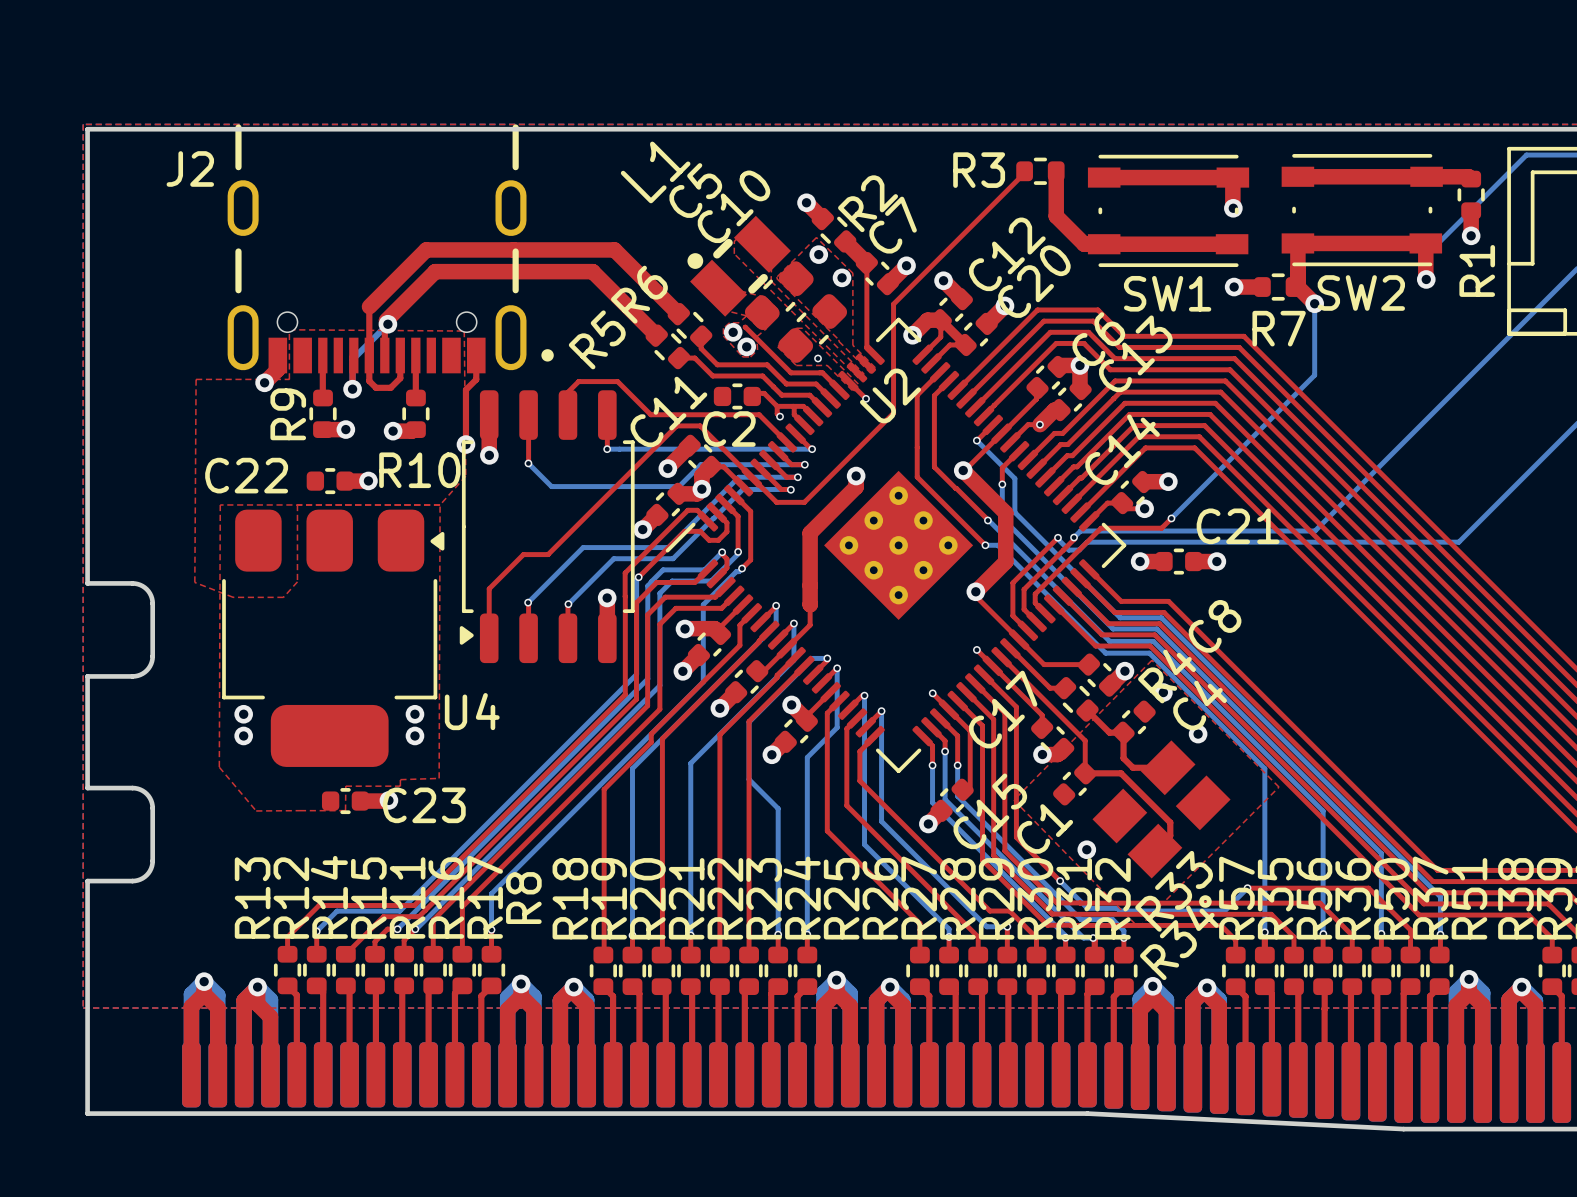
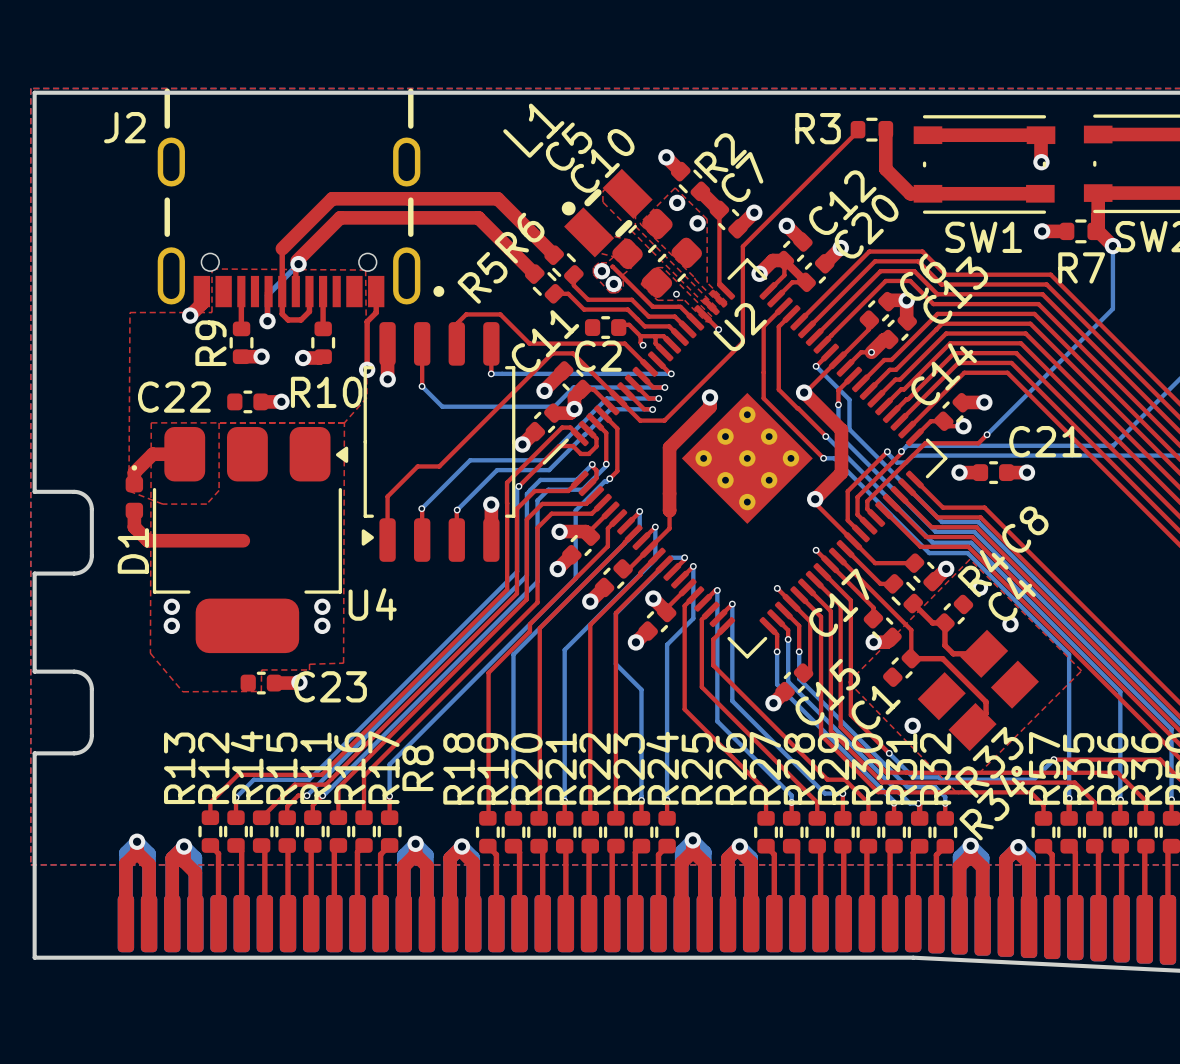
top track: none -> (184, 454) (152, 454) (134, 472) (134, 484)
D1: none -> (134, 491)
top track: none -> (134, 510) (134, 527) (147, 540) (243, 540)

